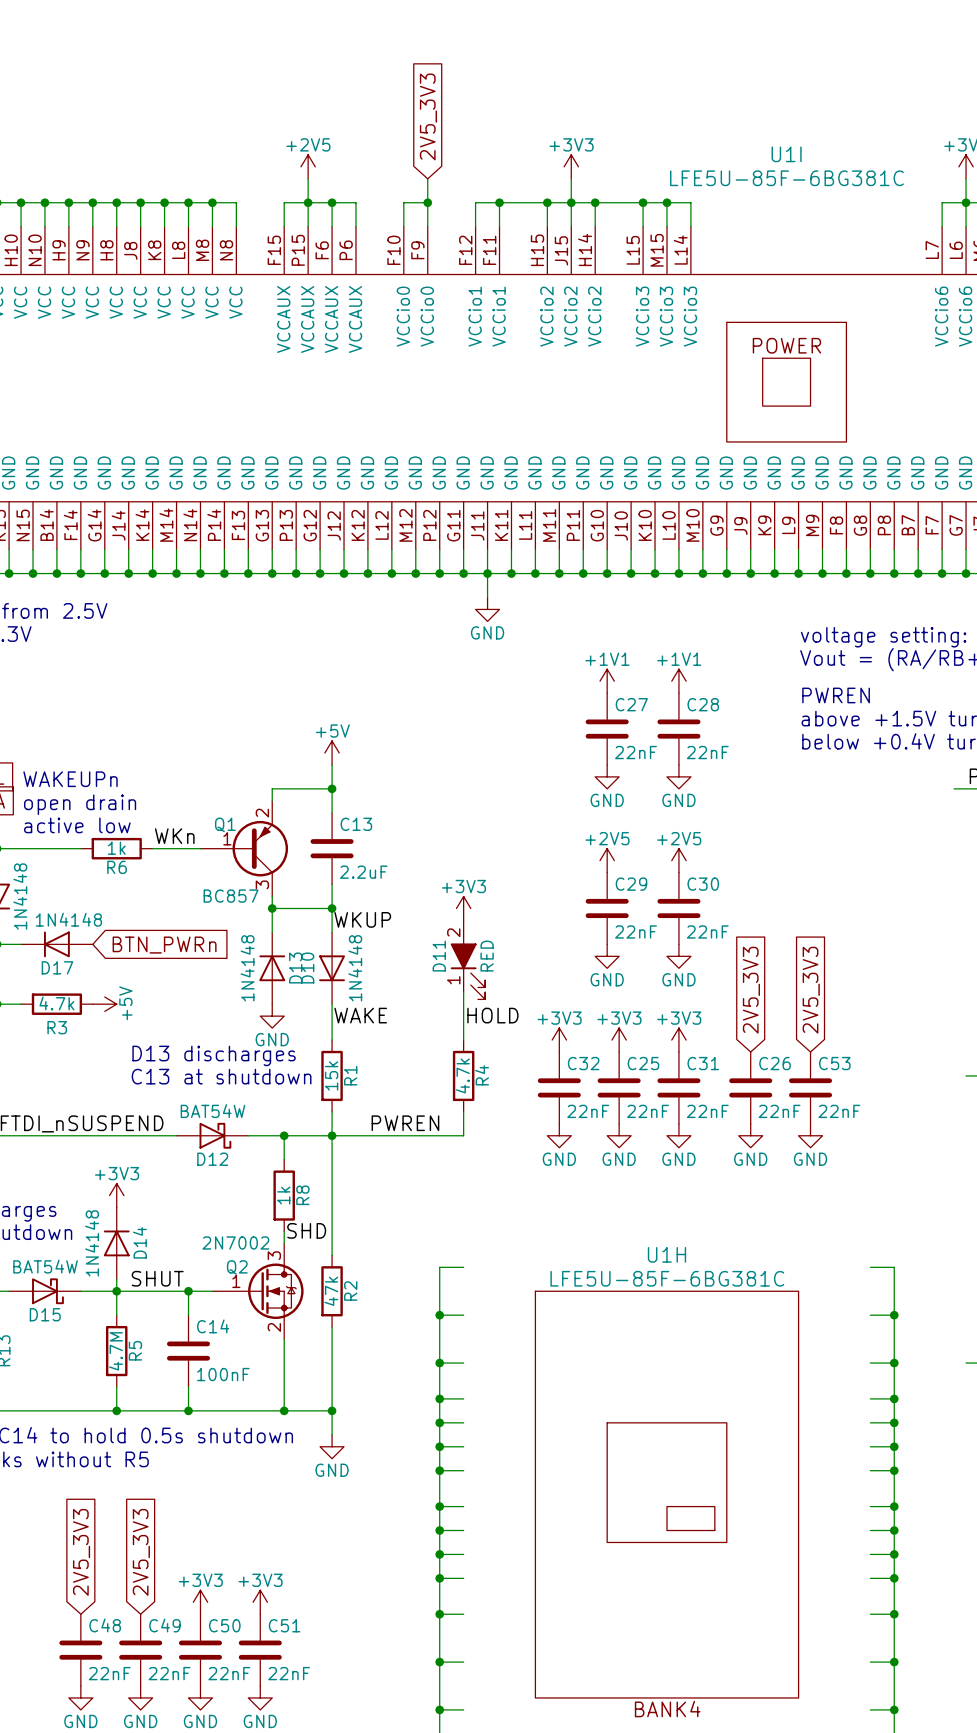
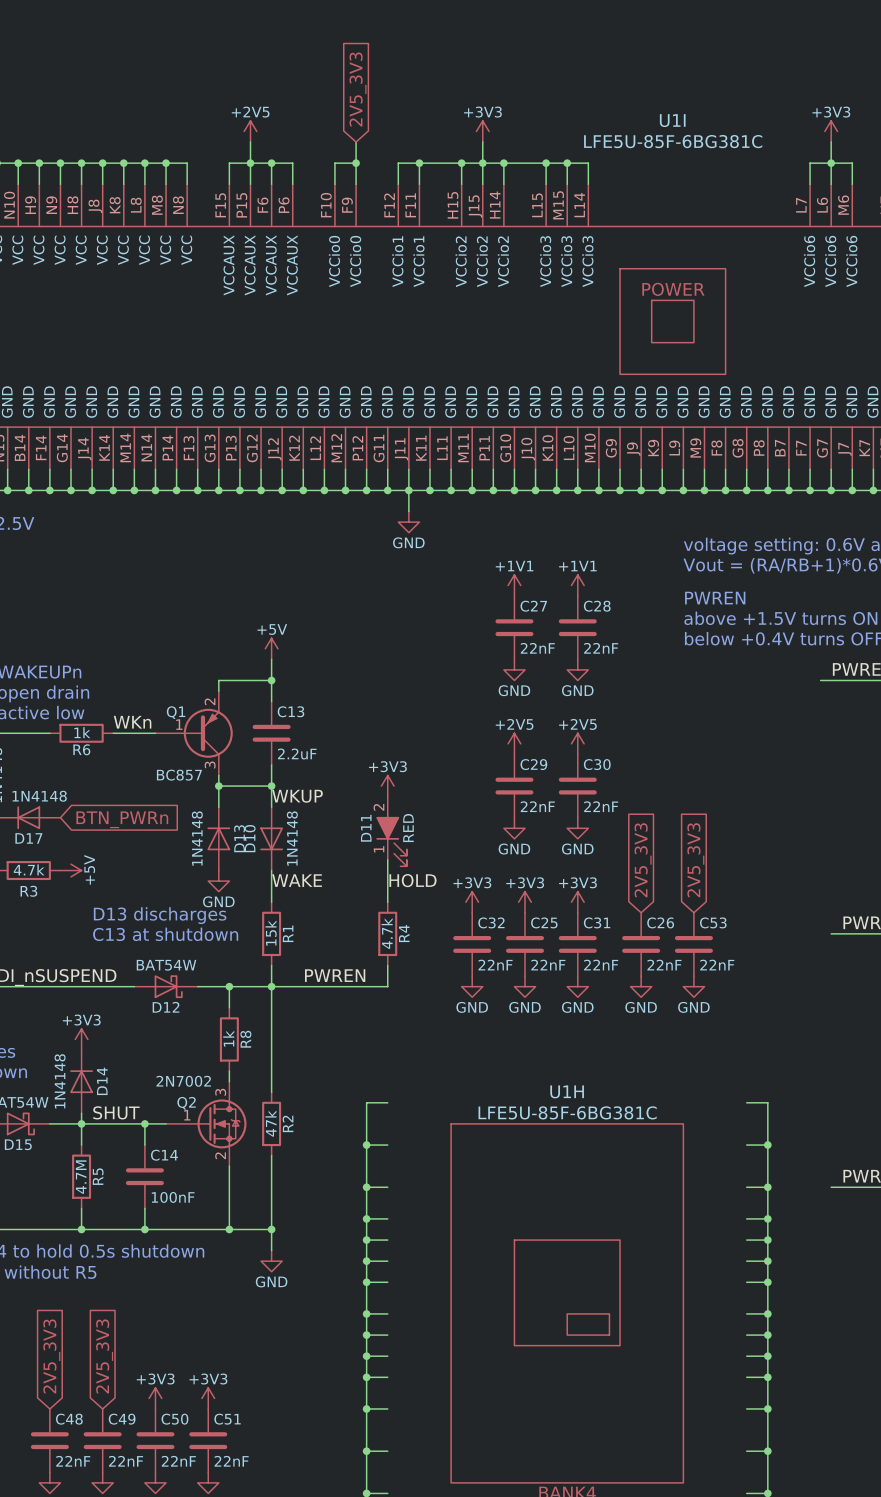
label: SHD (306, 1230) -> none

